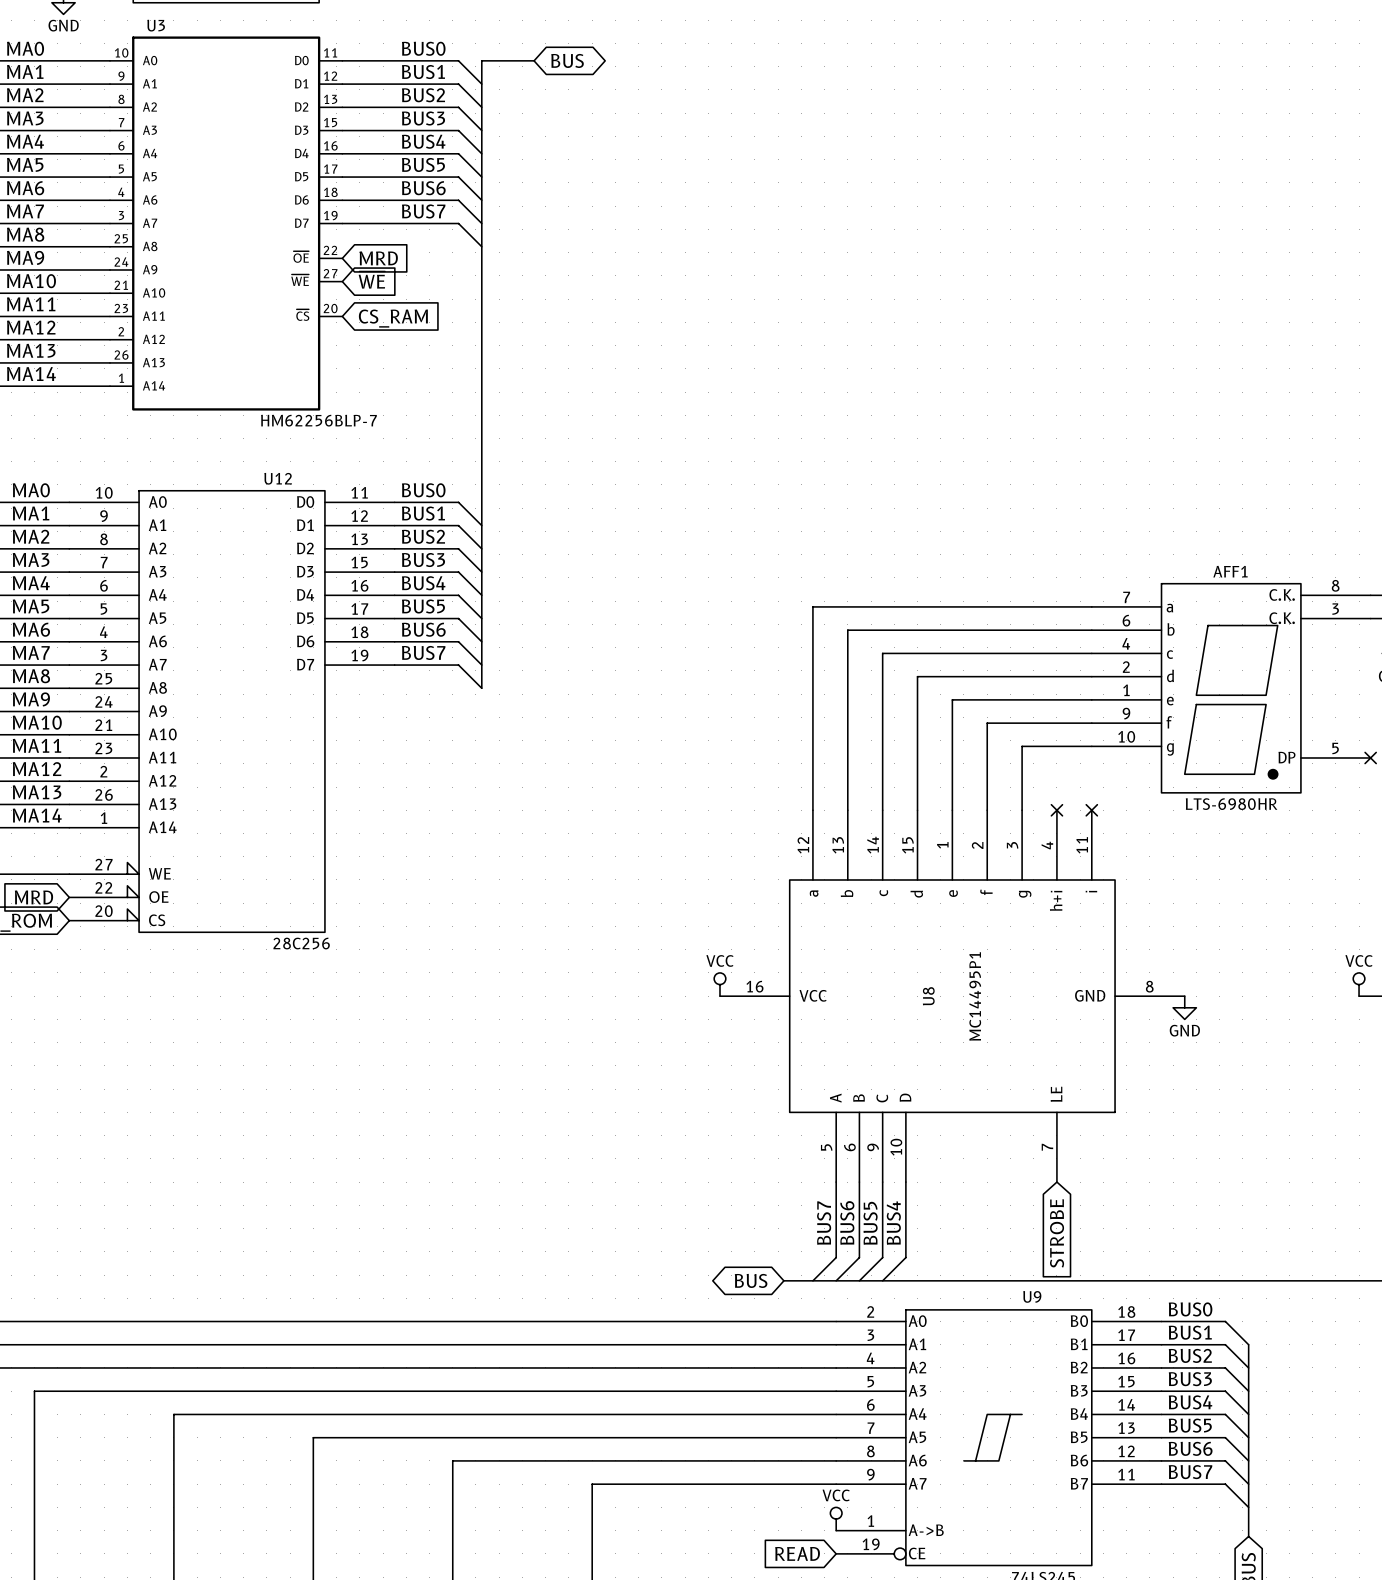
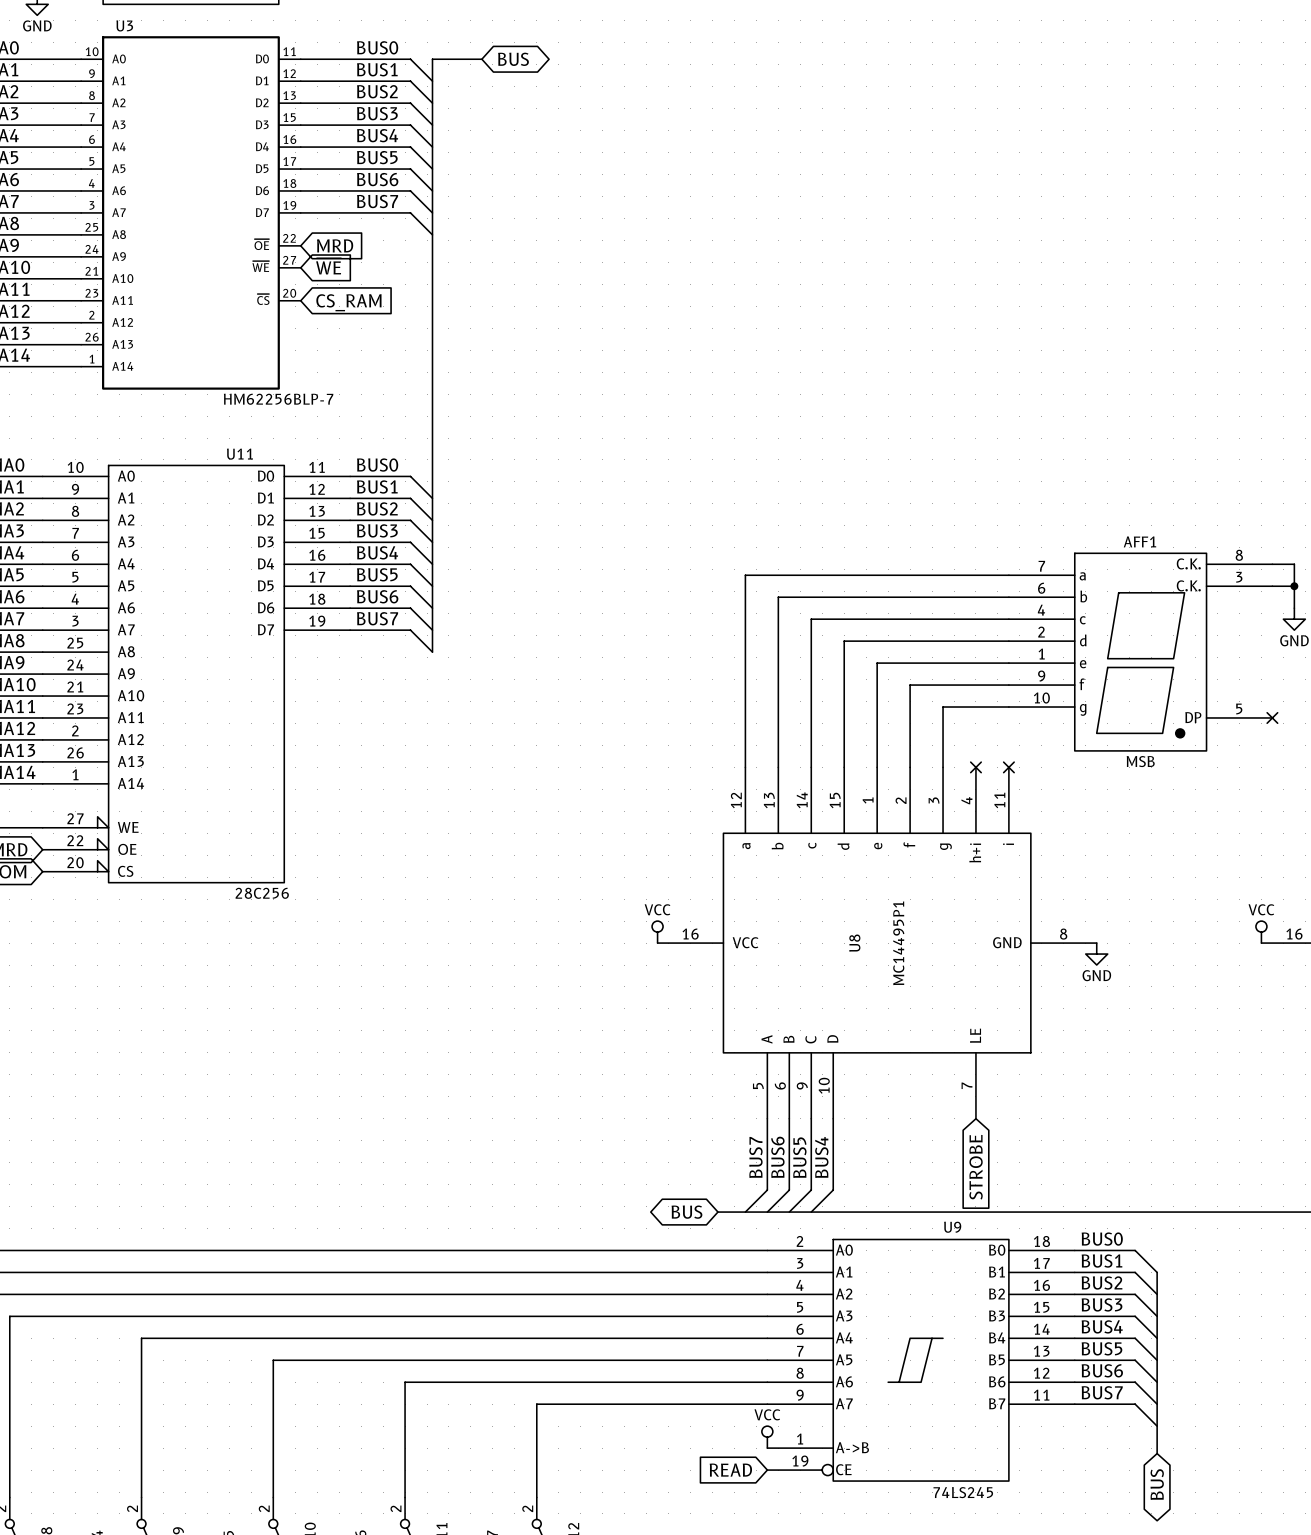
U12 name: U12 (278, 478) -> U11 (239, 454)
AFF1 value: LTS-6980HR (1231, 804) -> MSB (1140, 761)

